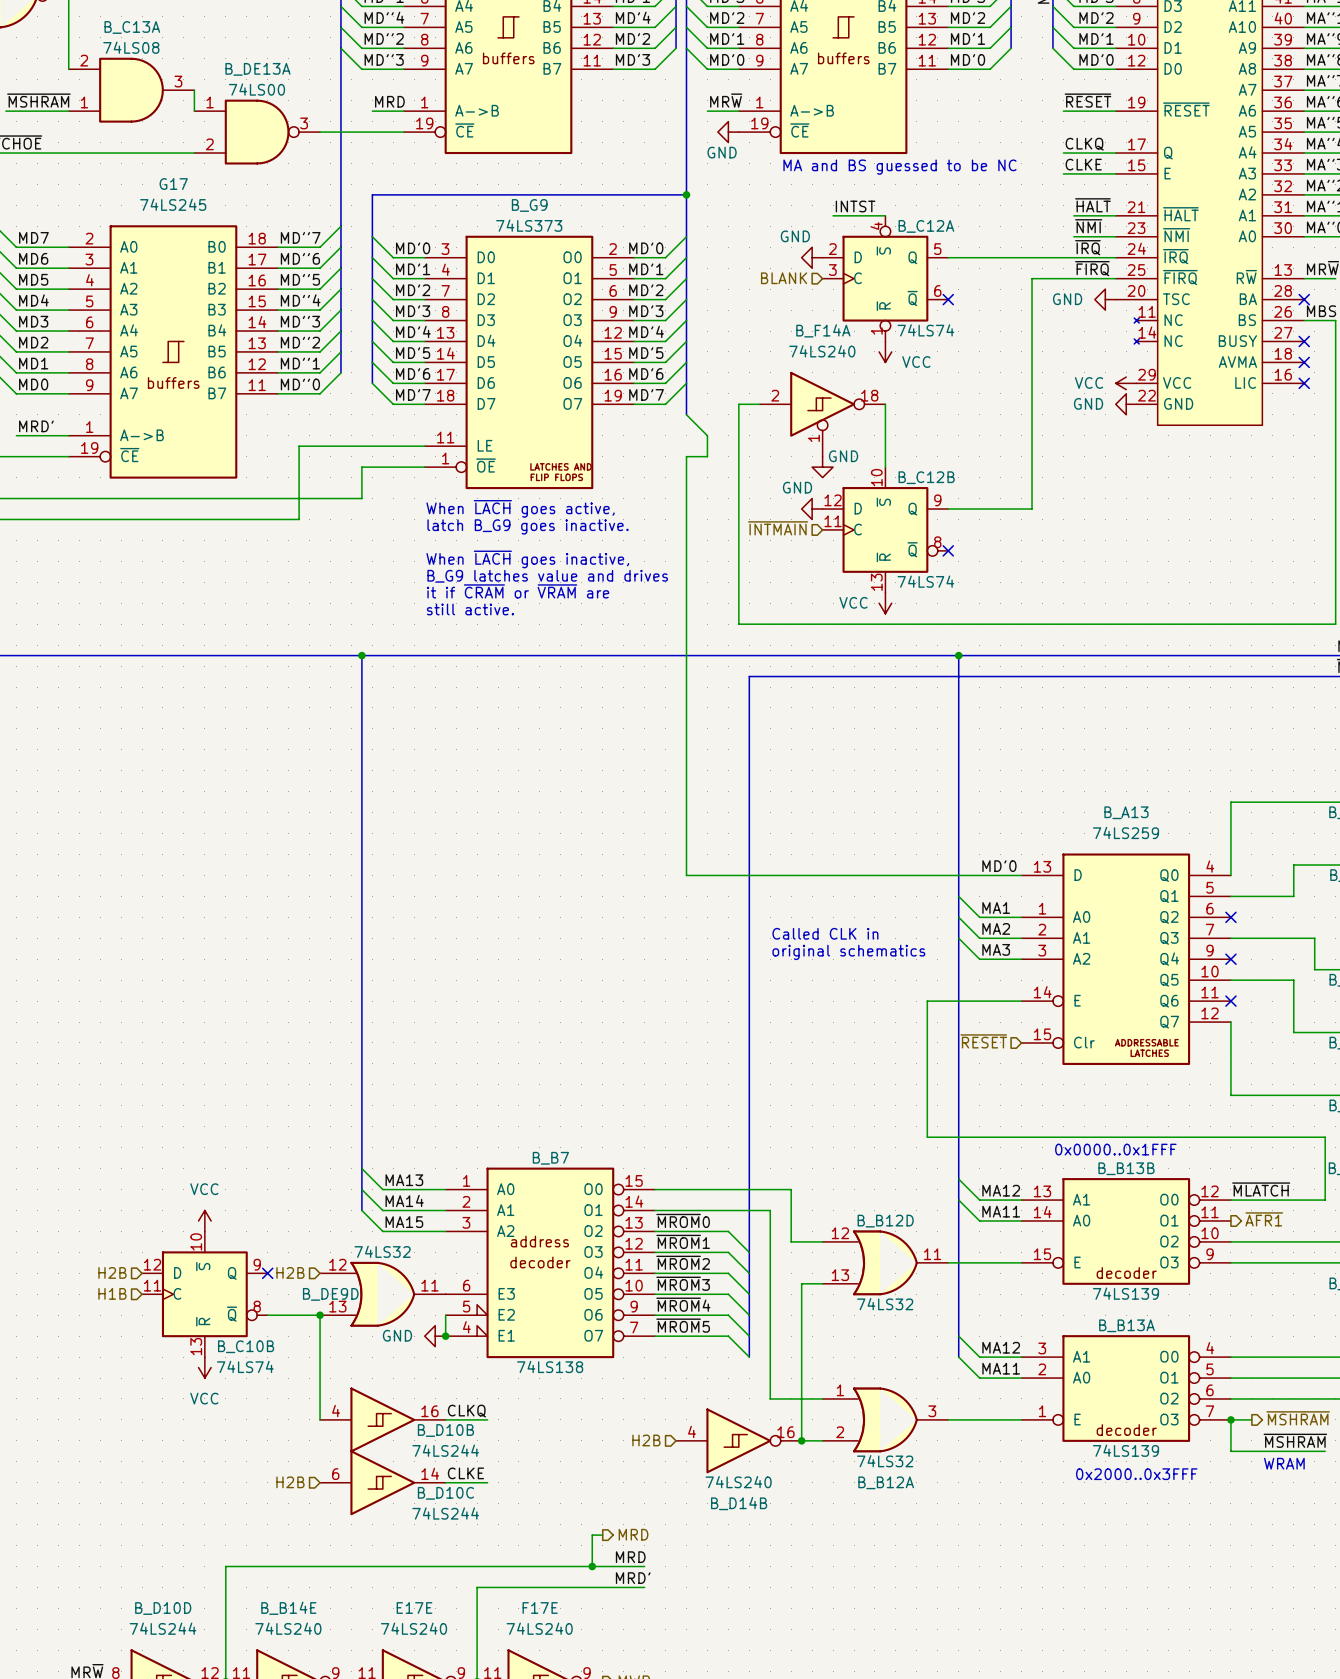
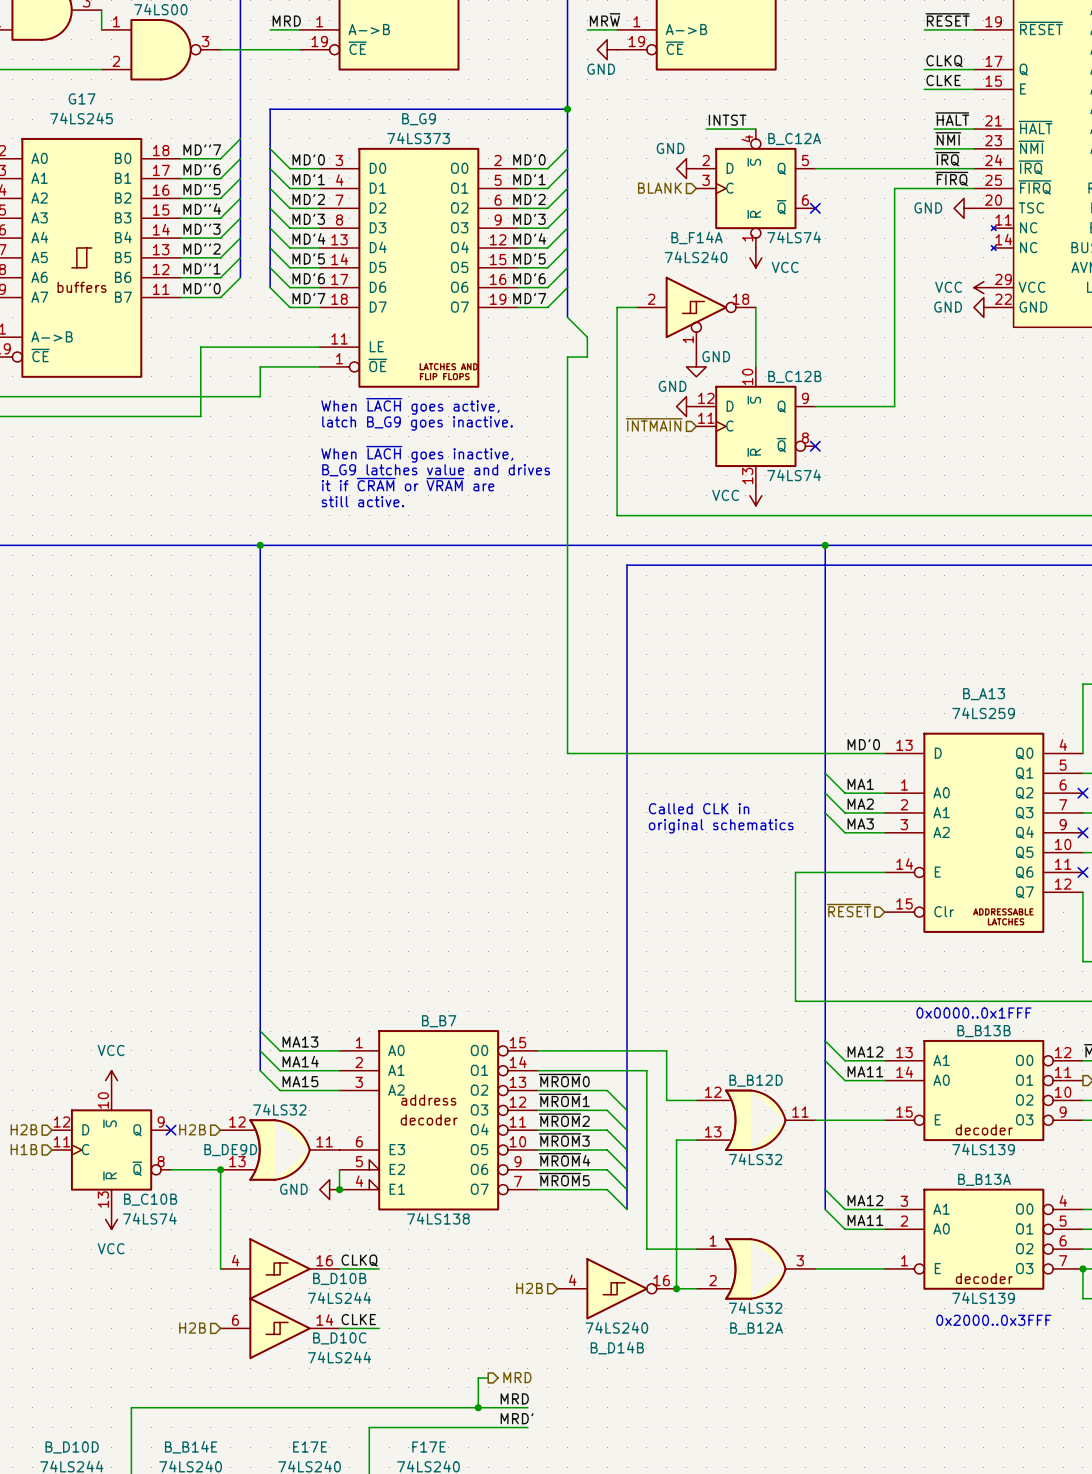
text: MA and BS guessed to be NC (899, 167) -> none

